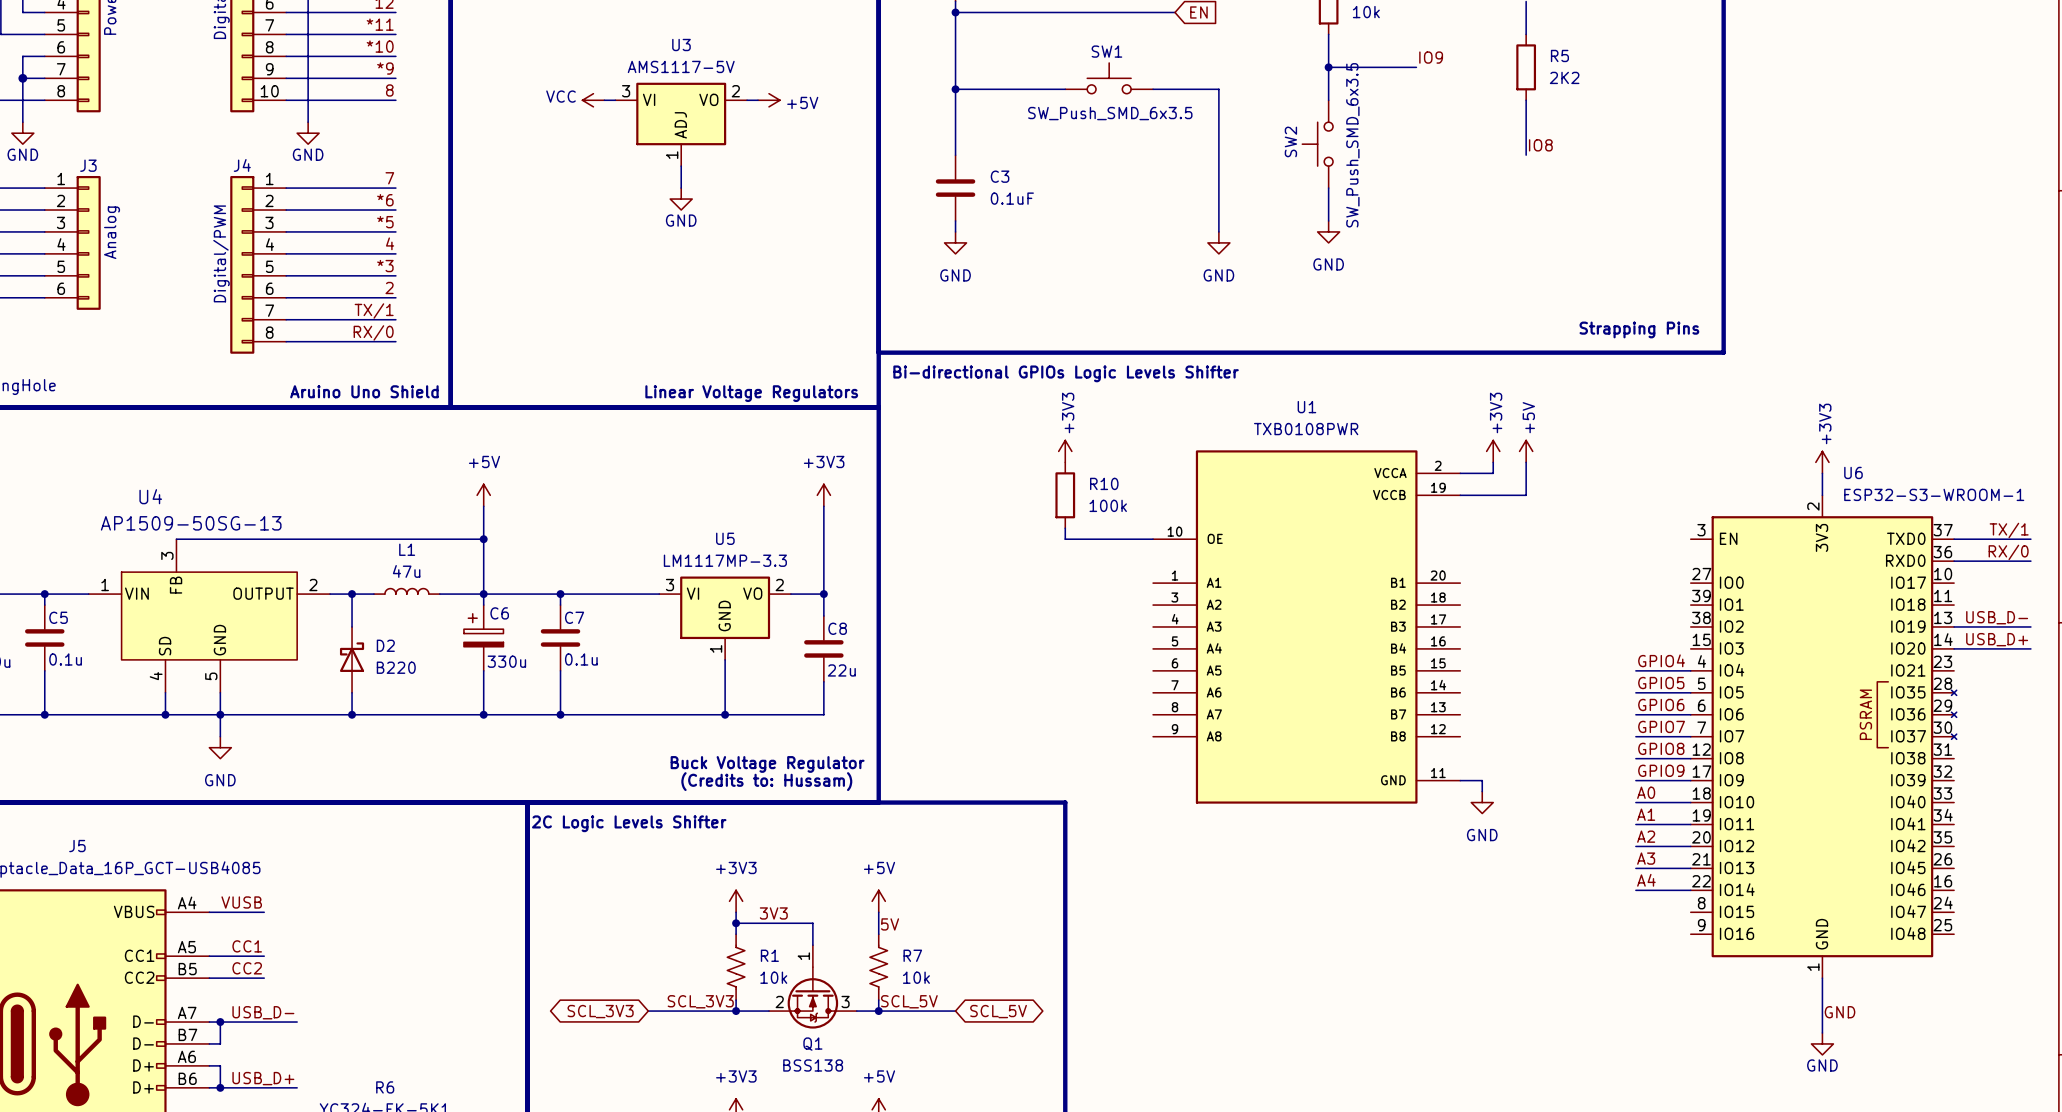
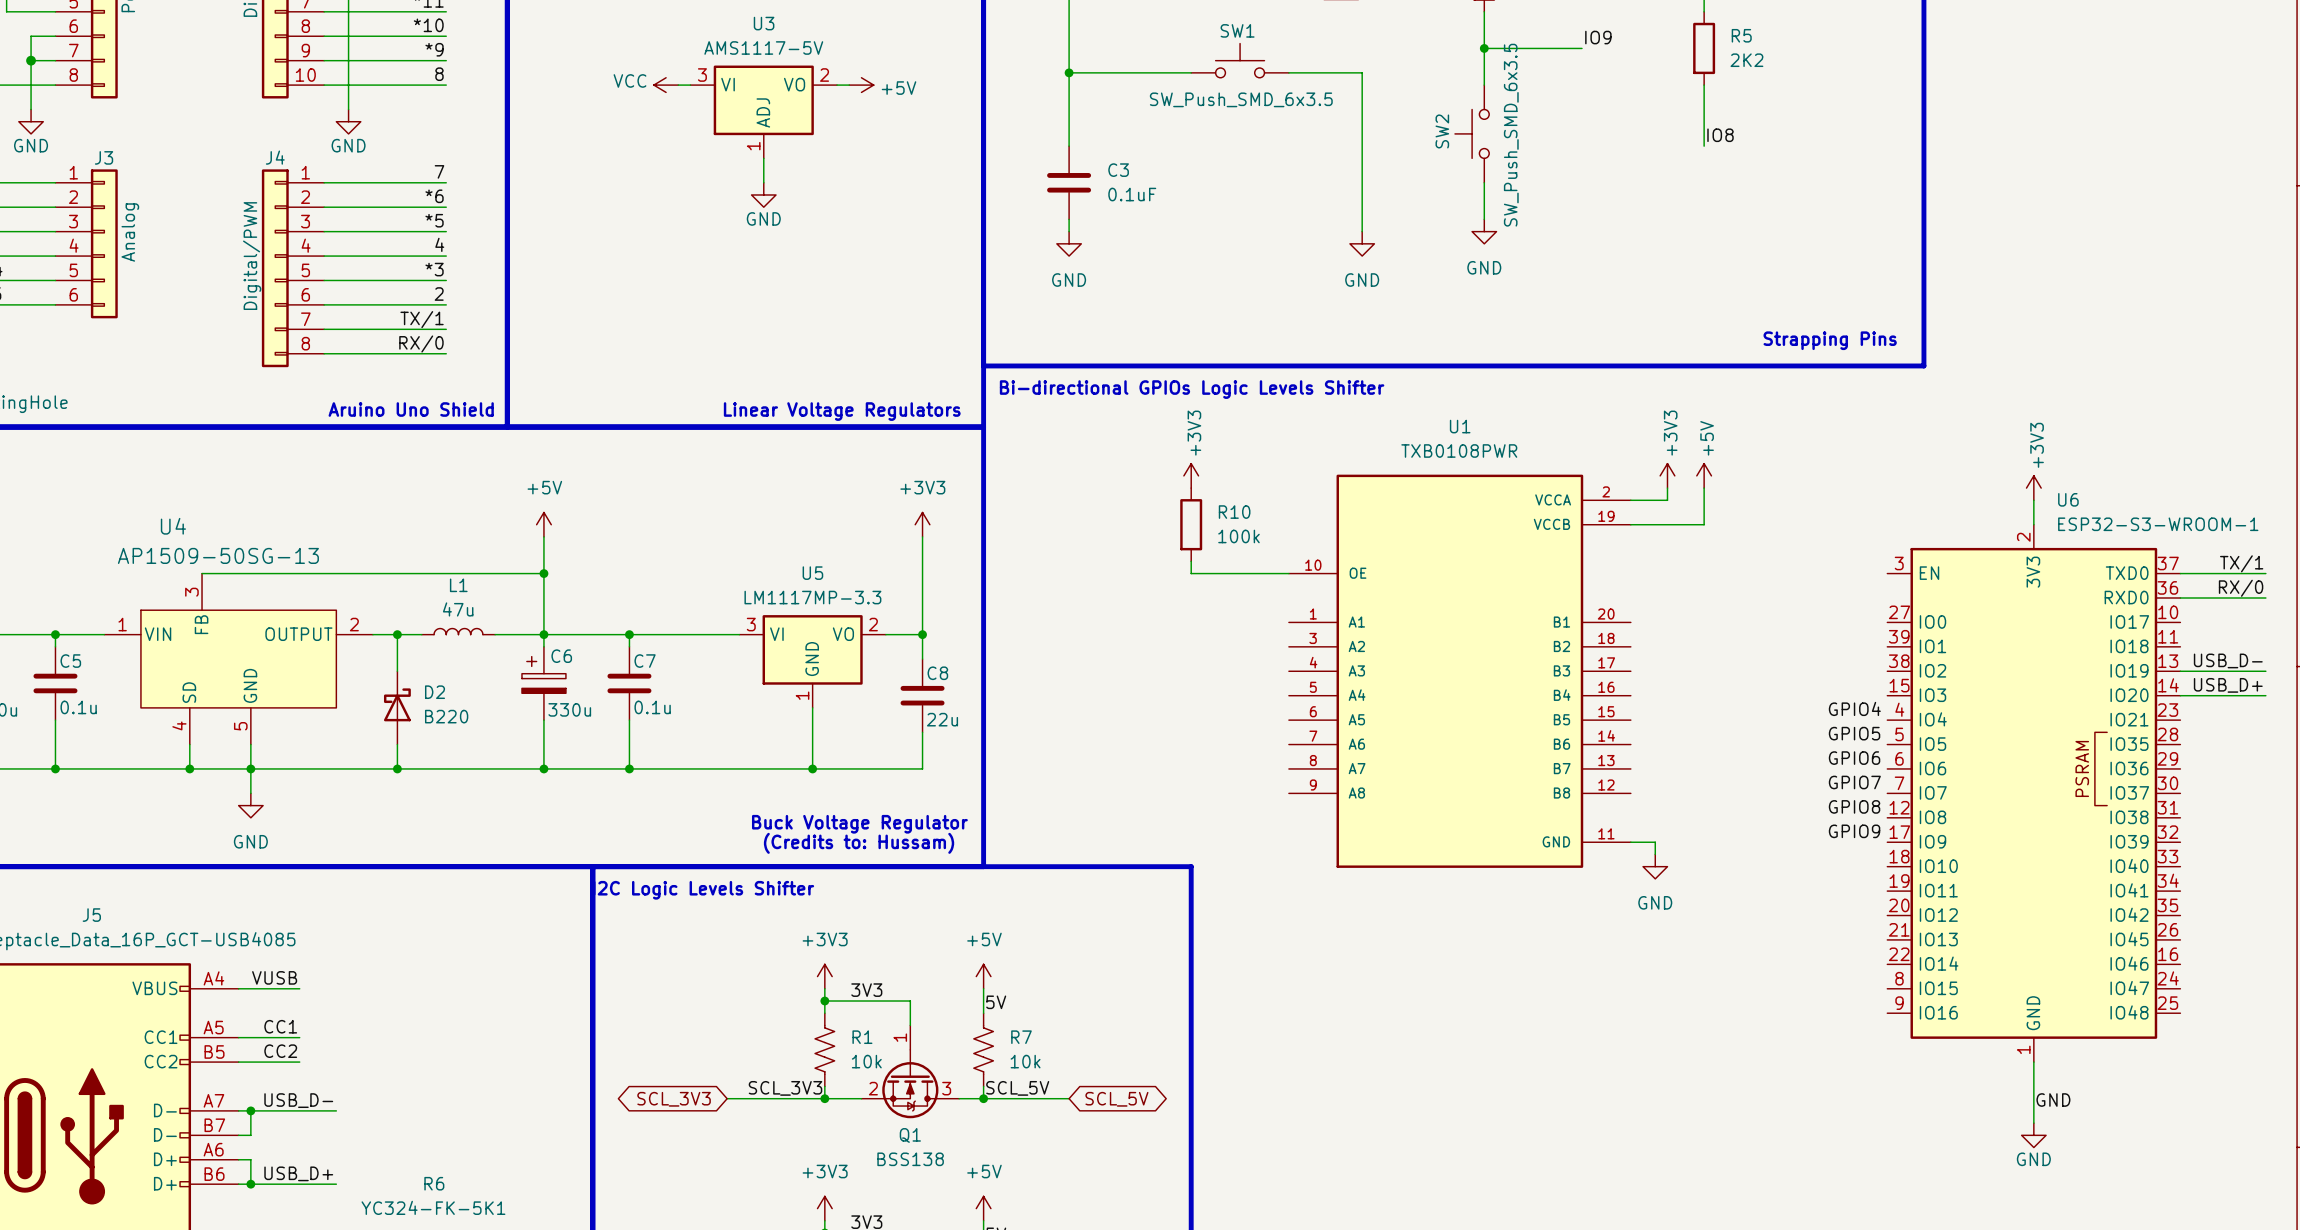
U6 symbol: [1690, 495, 1957, 979] -> [1887, 524, 2181, 1063]
wire: (1635, 670) (1690, 670) -> none
wire: (1635, 692) (1690, 692) -> none
wire: (1635, 714) (1690, 714) -> none
wire: (1635, 736) (1690, 736) -> none
wire: (1635, 758) (1690, 758) -> none
wire: (1635, 780) (1690, 780) -> none
label: A0 (1646, 792) -> none
wire: (1635, 802) (1690, 802) -> none
label: A1 (1646, 814) -> none
wire: (1635, 824) (1690, 824) -> none
label: A2 (1646, 836) -> none
wire: (1635, 846) (1690, 846) -> none
label: A3 (1646, 858) -> none
wire: (1635, 868) (1690, 868) -> none
label: A4 (1646, 880) -> none
wire: (1635, 890) (1690, 890) -> none

